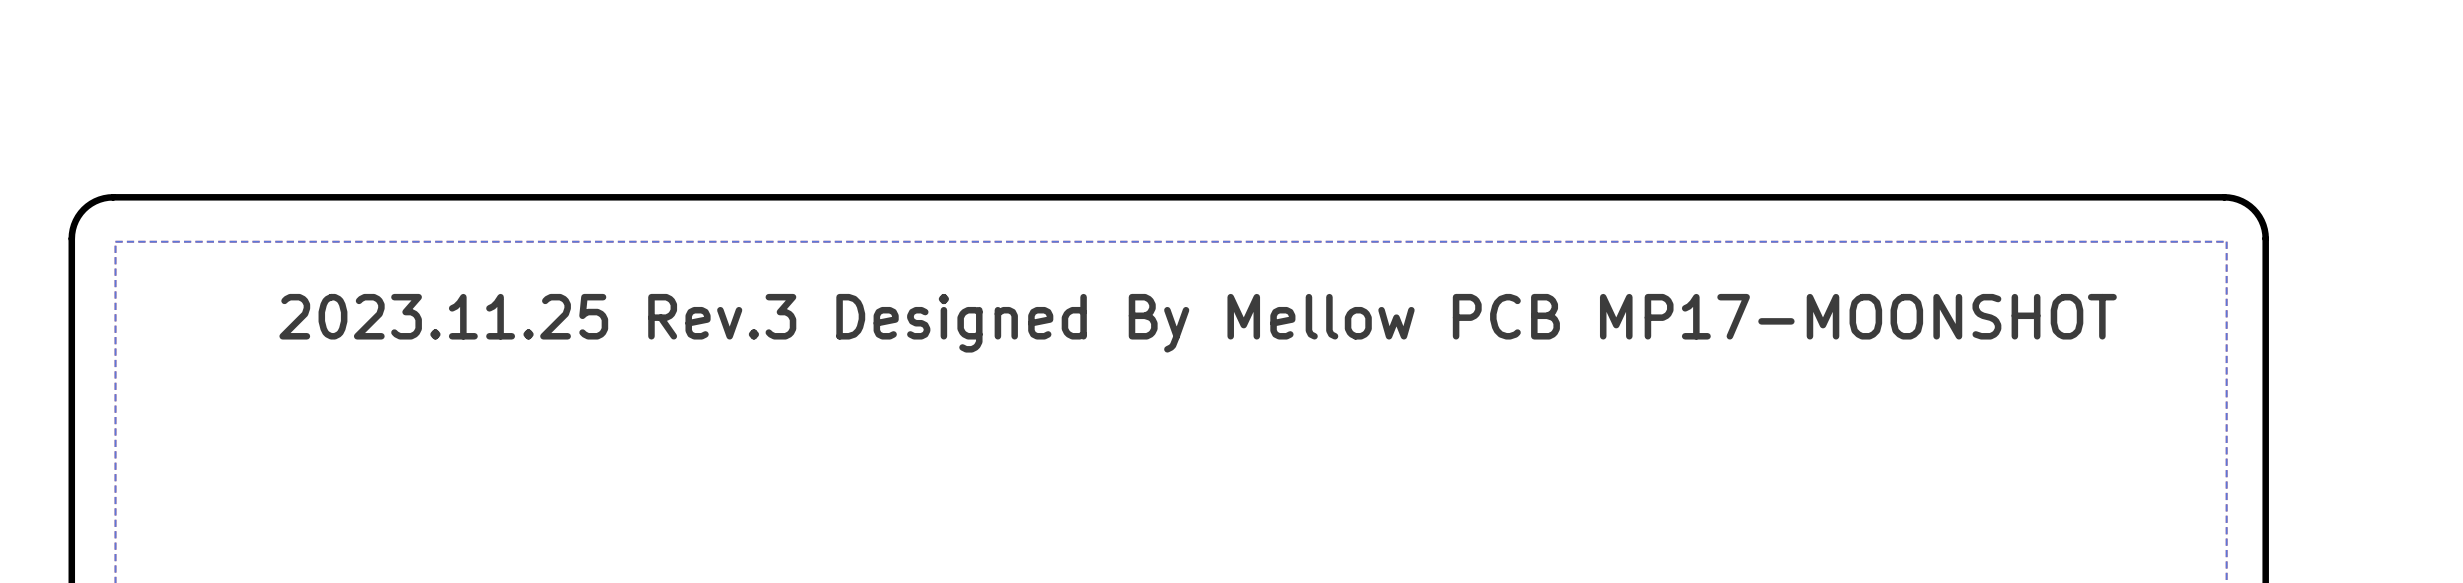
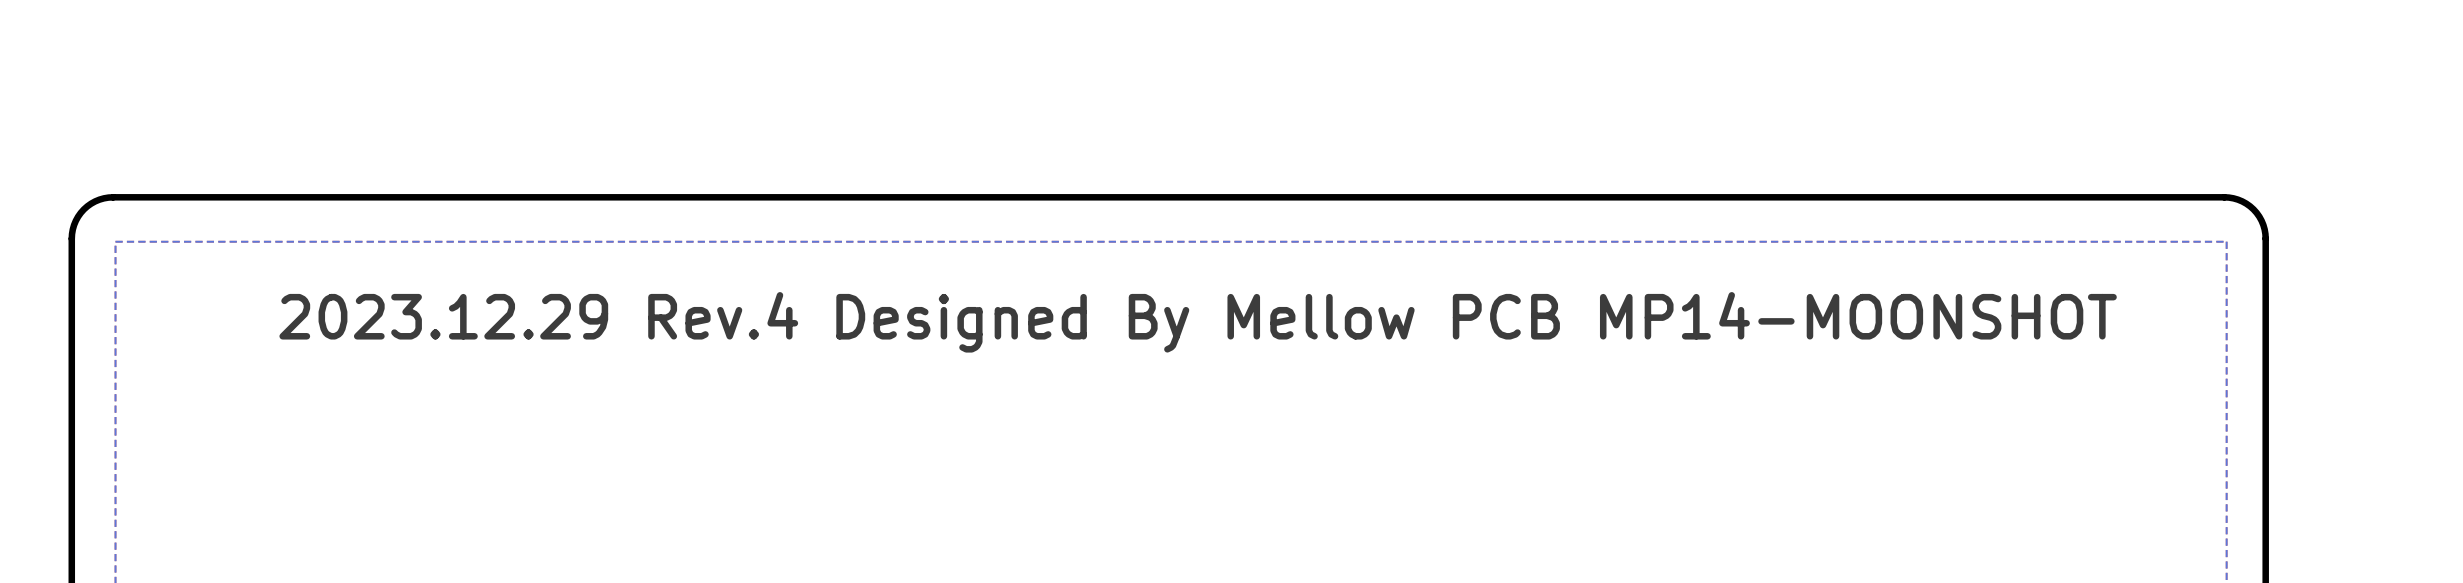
text: 2023.11.25 Rev.3 Designed By Mellow PCB MP17-MOONSHOT (1198, 323) -> 2023.12.29 Rev.4 Designed By Mellow PCB MP14-MOONSHOT (1198, 322)

